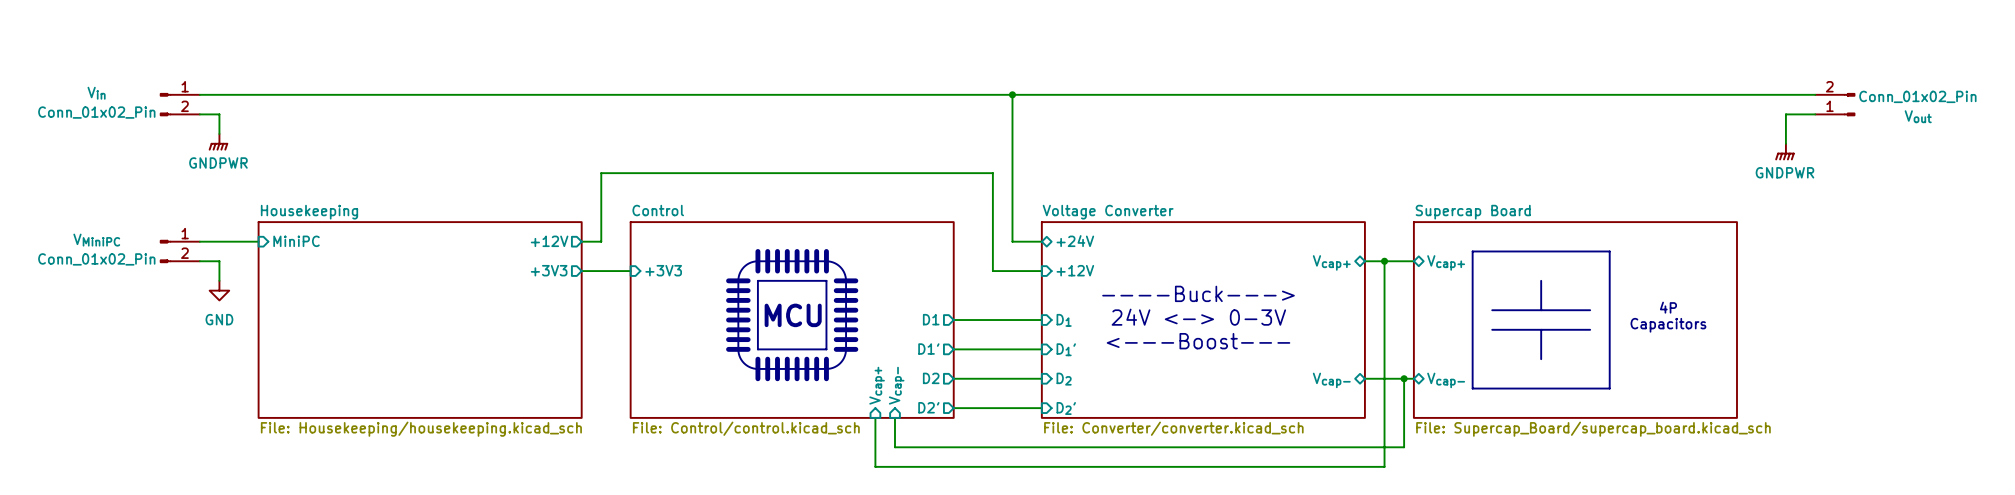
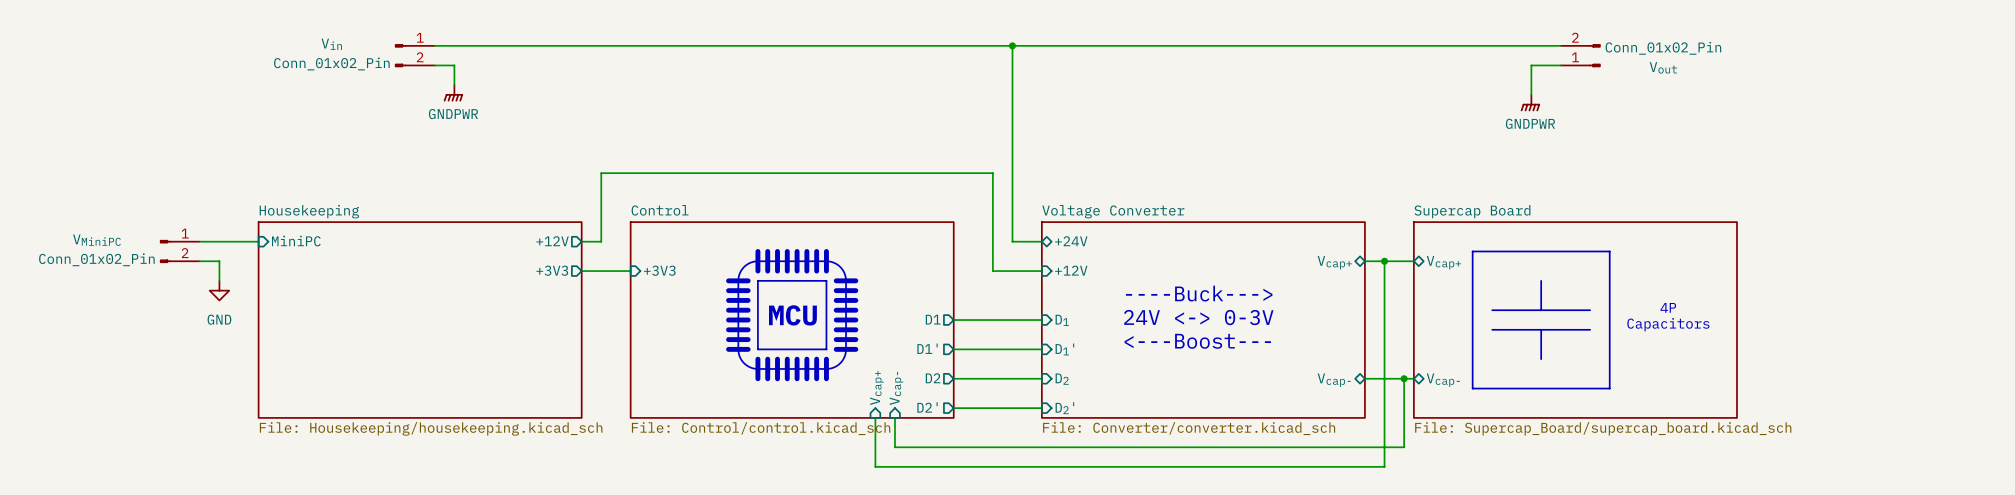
wire: none -> (434, 45) (1560, 45)
wire: none -> (1012, 45) (1012, 94)
junction: none -> (1012, 45)
Vin: none -> Conn_01x02_Pin (414, 55)
Vout: none -> Conn_01x02_Pin (1580, 55)
wire: none -> (434, 65) (454, 65) (454, 85)
wire: none -> (1560, 65) (1531, 65) (1531, 94)
power symbol: none -> GNDPWR (453, 93)
wire: (199, 94) (1815, 94) -> none
junction: (1012, 94) -> none
power symbol: none -> GNDPWR (1530, 103)
Vin: Conn_01x02_Pin (179, 104) -> none
Vout: Conn_01x02_Pin (1835, 104) -> none
wire: (199, 114) (219, 114) (219, 133) -> none
wire: (1815, 114) (1785, 114) (1785, 143) -> none
power symbol: GNDPWR (218, 142) -> none
power symbol: GNDPWR (1784, 152) -> none

